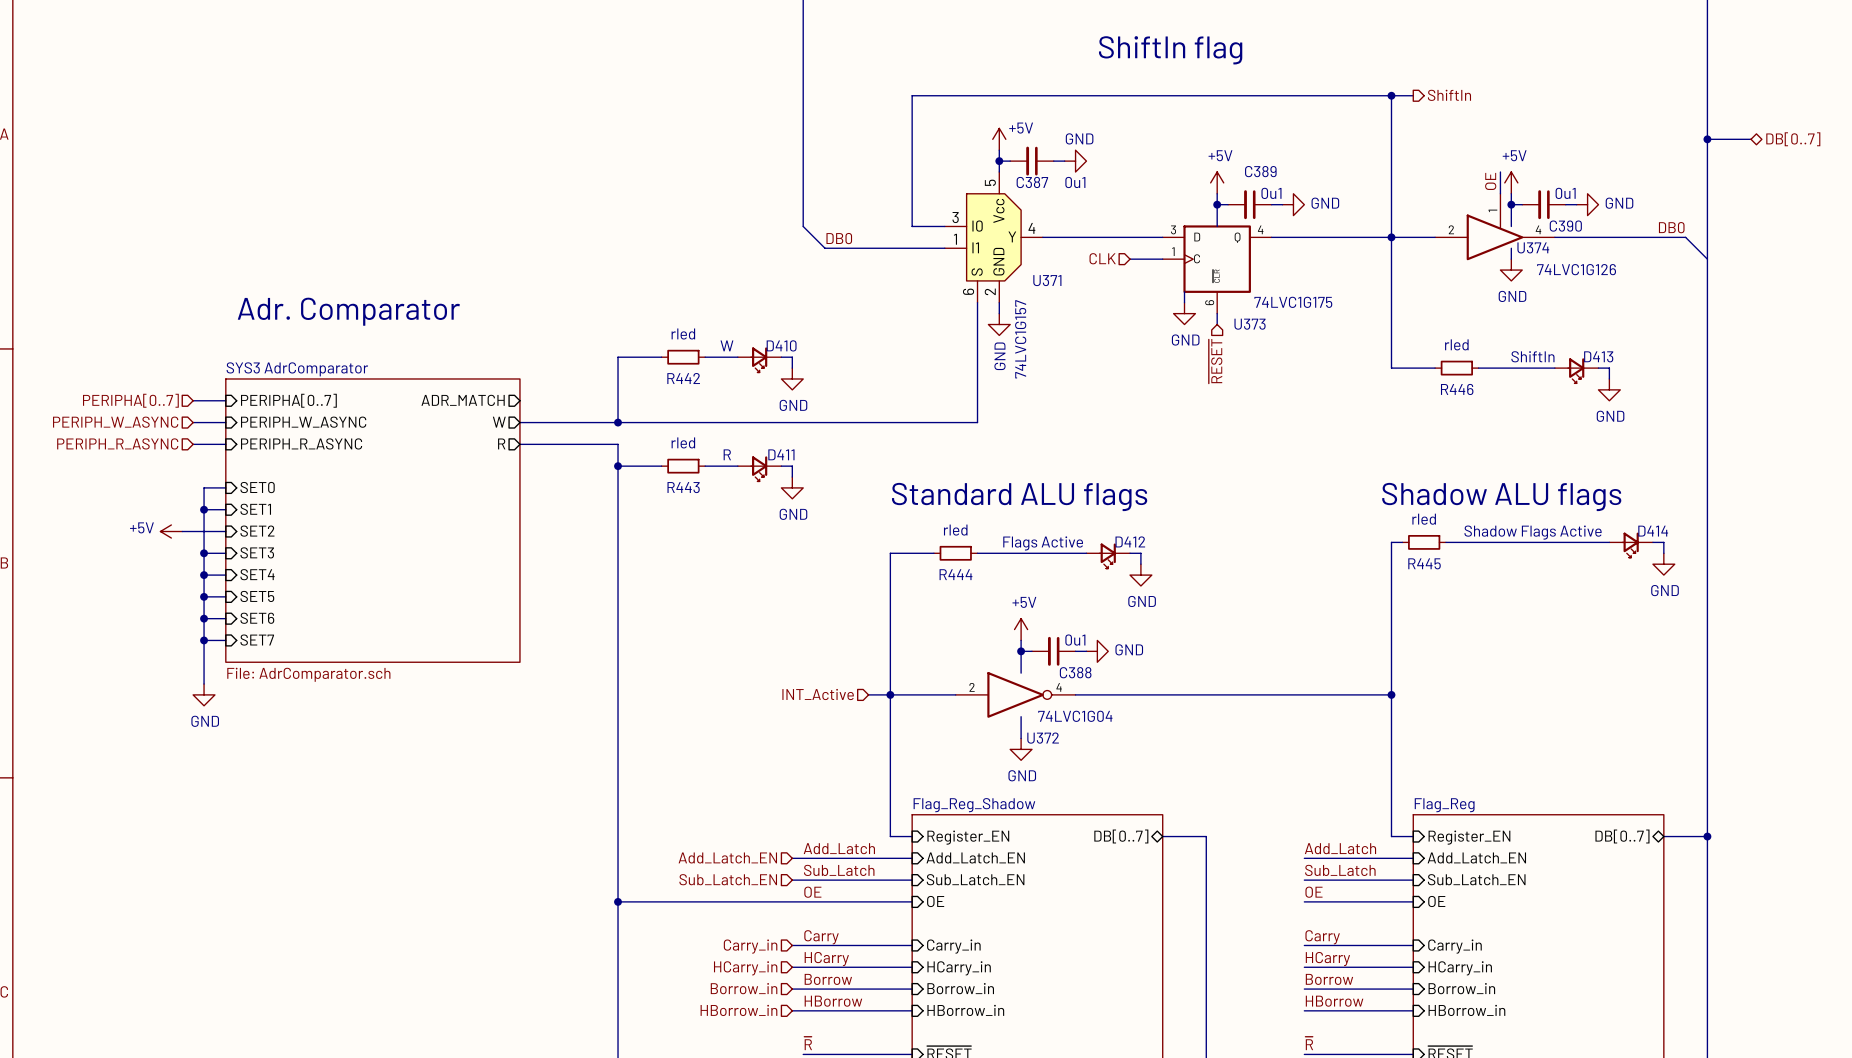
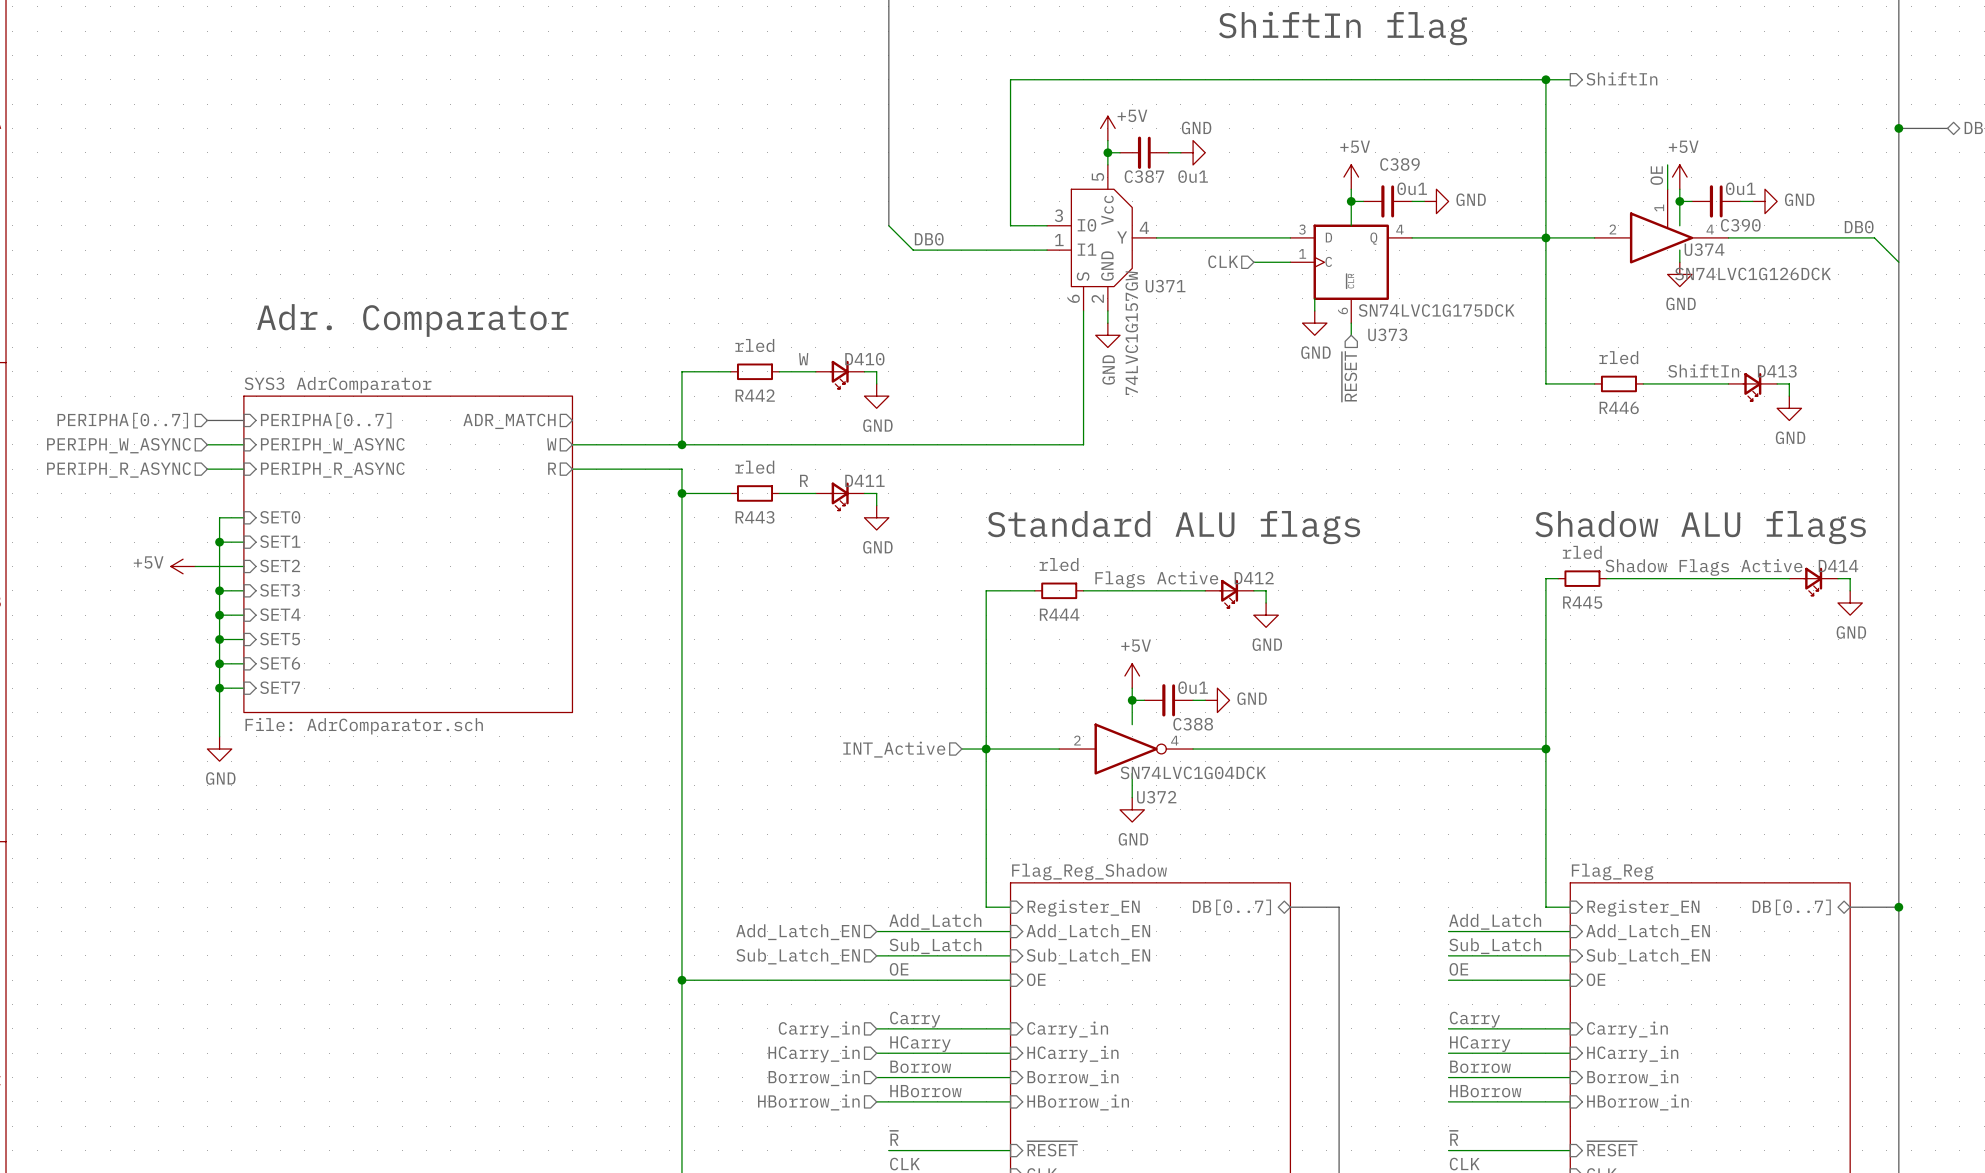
U374 value: 74LVC1G126 (1576, 269) -> SN74LVC1G126DCK (1753, 273)
U373 value: 74LVC1G175 (1293, 302) -> SN74LVC1G175DCK (1436, 310)
U371 value: 74LVC1G157 (1020, 339) -> 74LVC1G157GW (1131, 333)
U372 value: 74LVC1G04 (1075, 716) -> SN74LVC1G04DCK (1193, 772)

